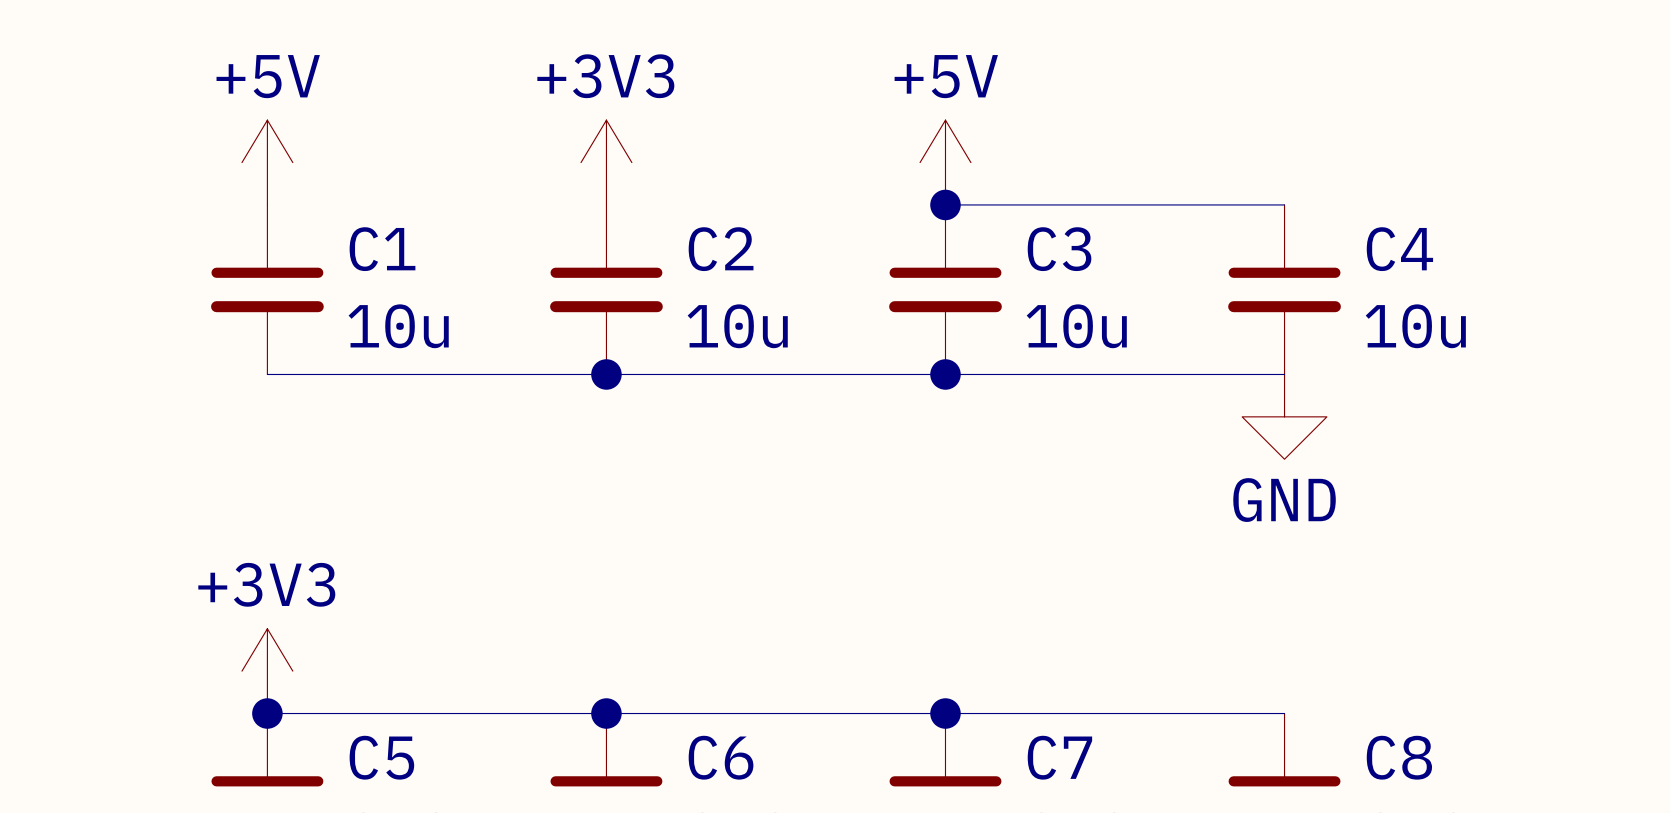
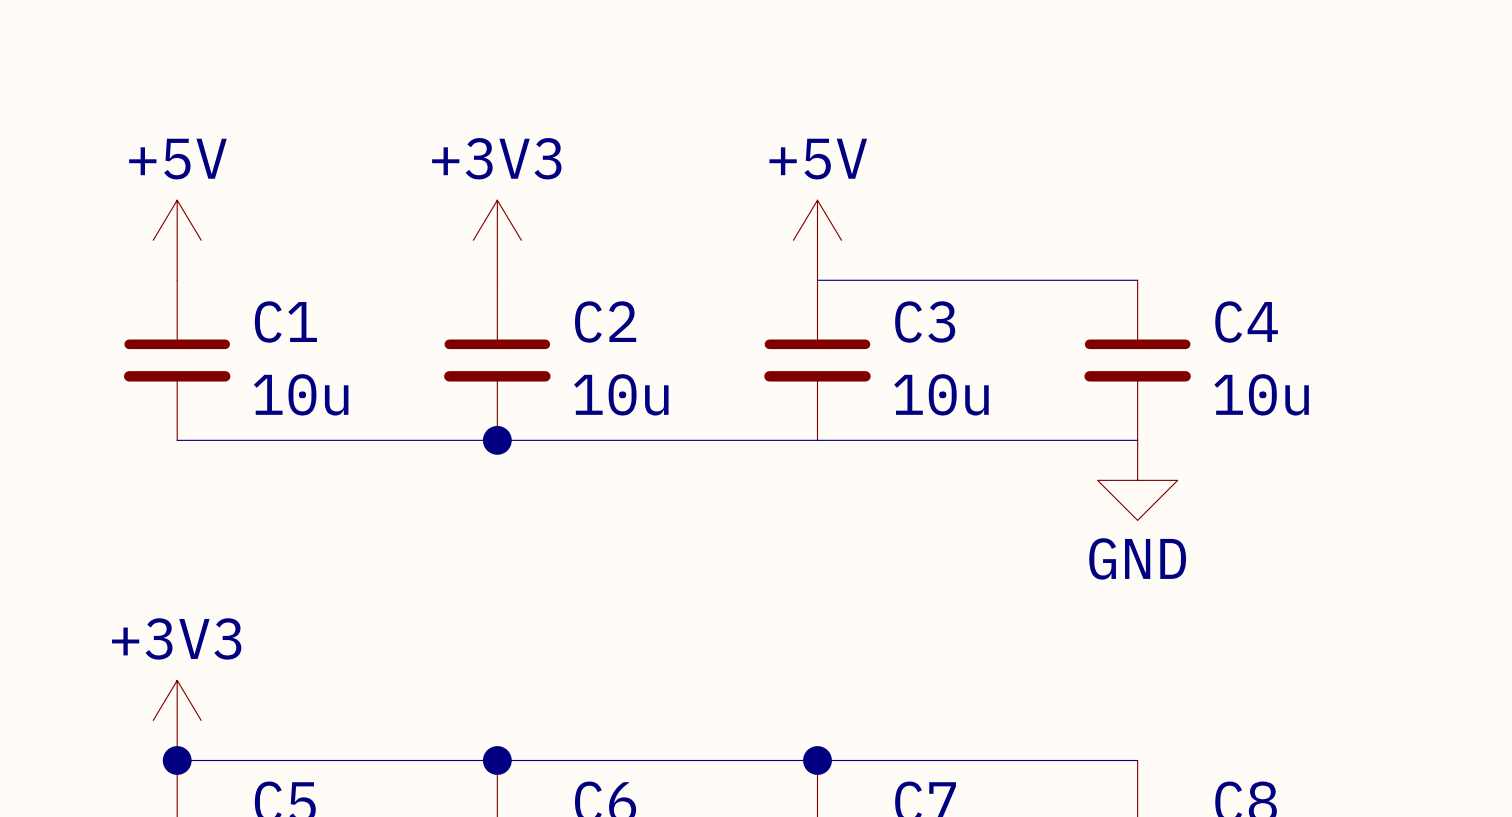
junction: (945, 204) -> none
junction: (945, 374) -> none

